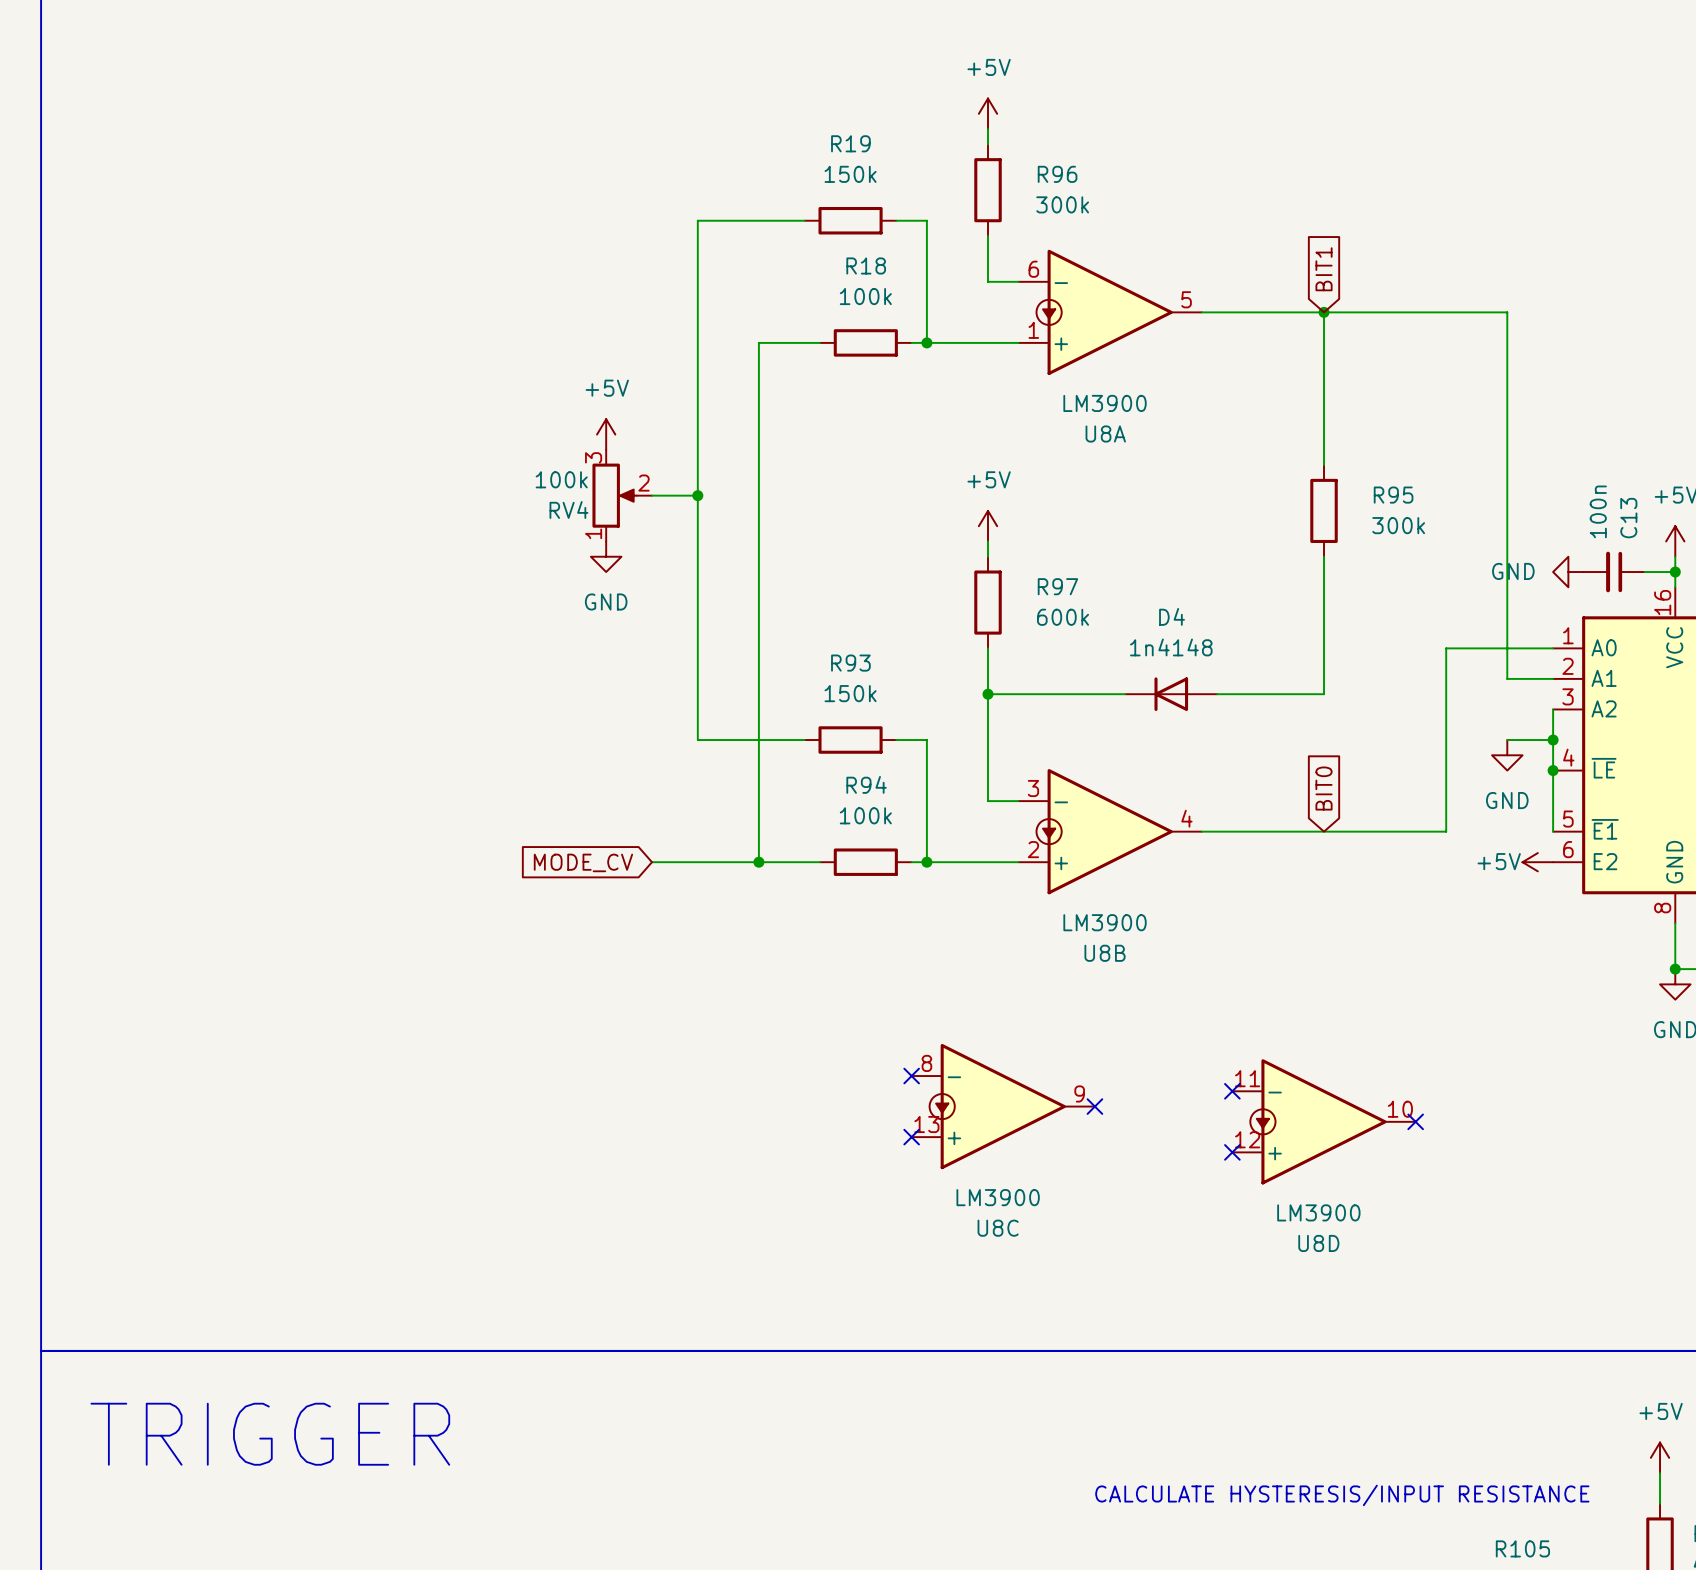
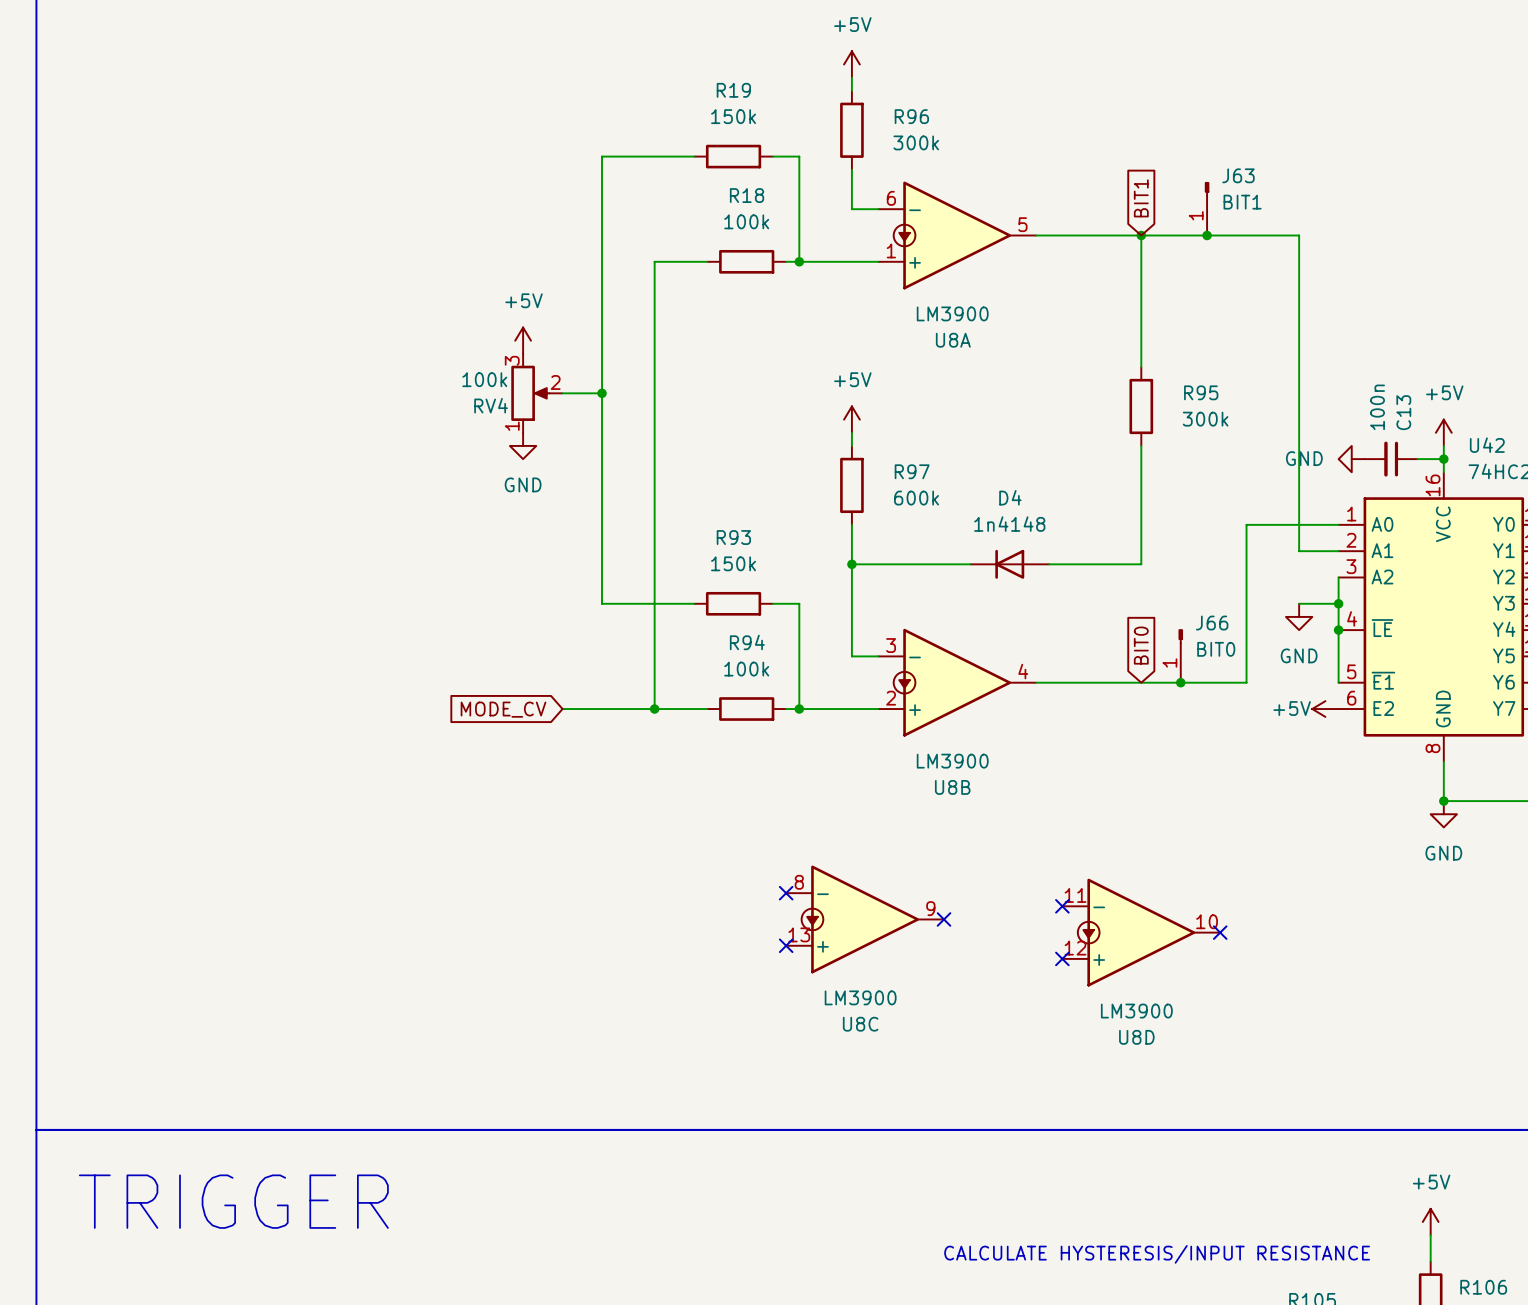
J63: none -> BIT1 (1207, 208)
junction: none -> (1207, 235)
J66: none -> BIT0 (1180, 656)
junction: none -> (1180, 682)

